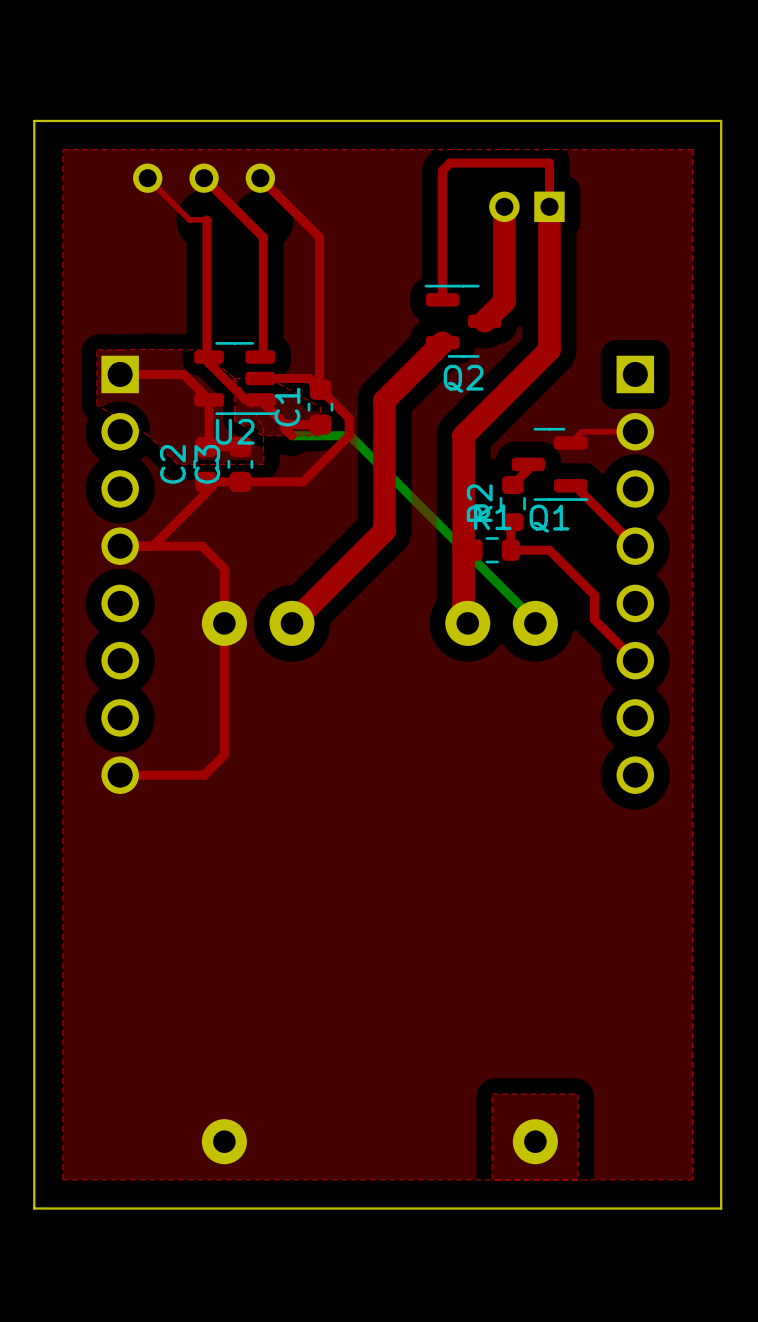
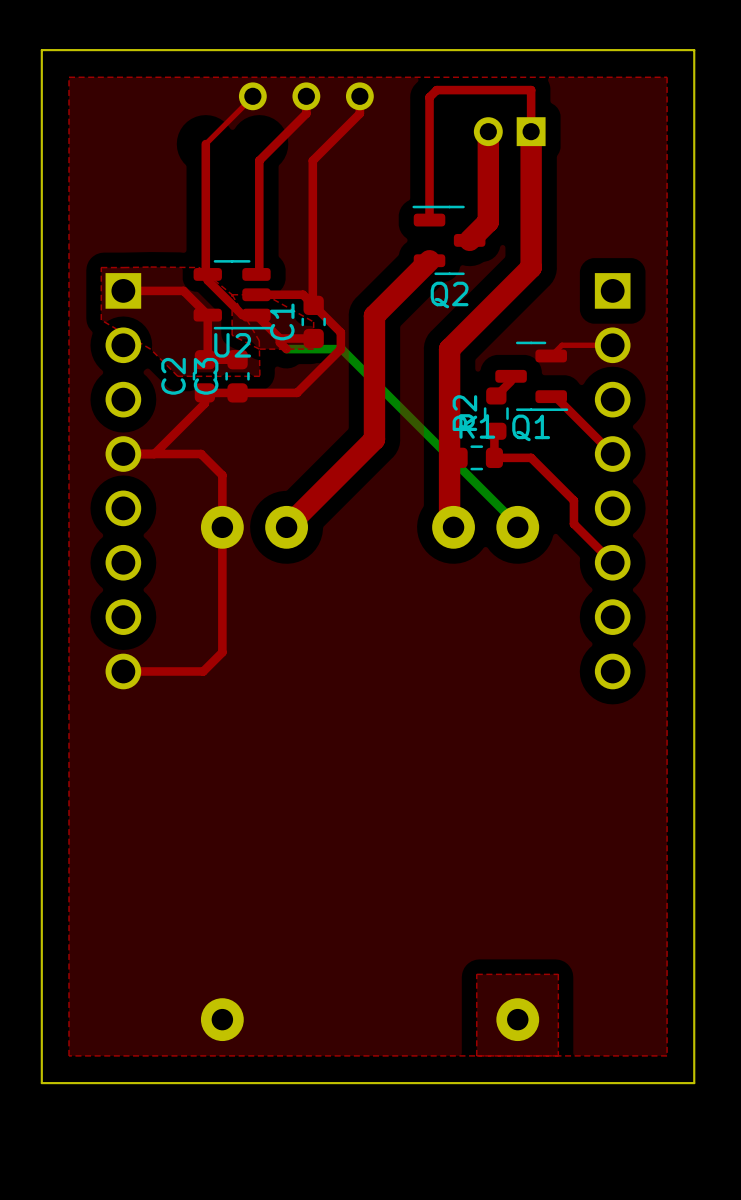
top track: (147, 178) (189, 219) (206, 219) -> (252, 96) (205, 144)
top track: (204, 178) (263, 237) -> (306, 96) (306, 113) (259, 160)
part position: (204, 178) -> (306, 96)
top track: (260, 178) (319, 237) -> (359, 96) (359, 113) (312, 160)

